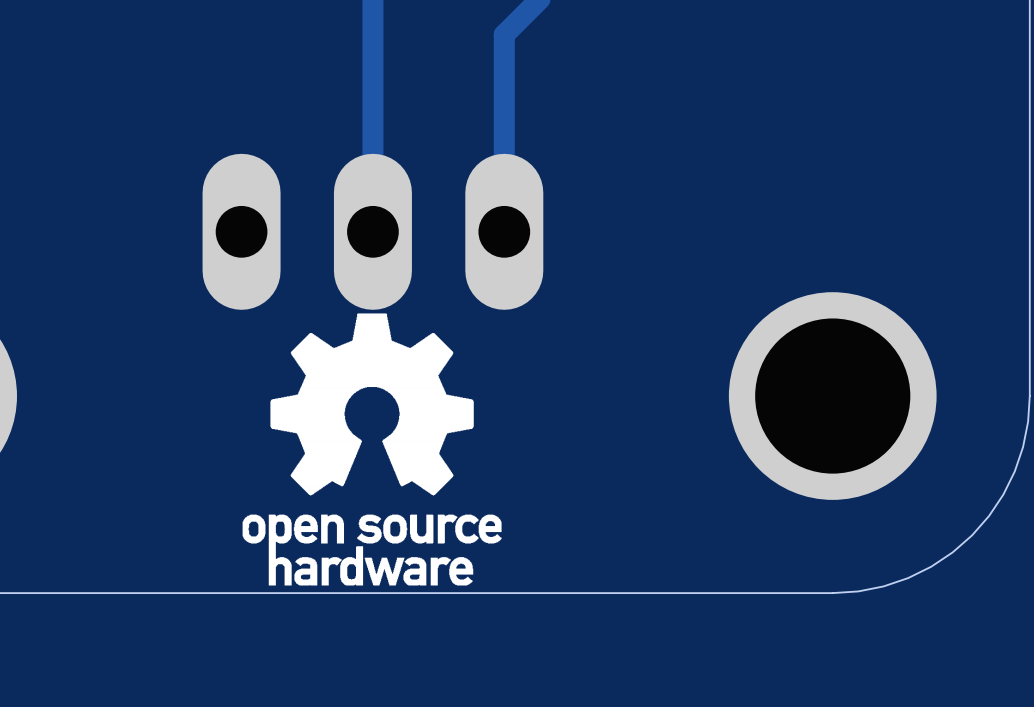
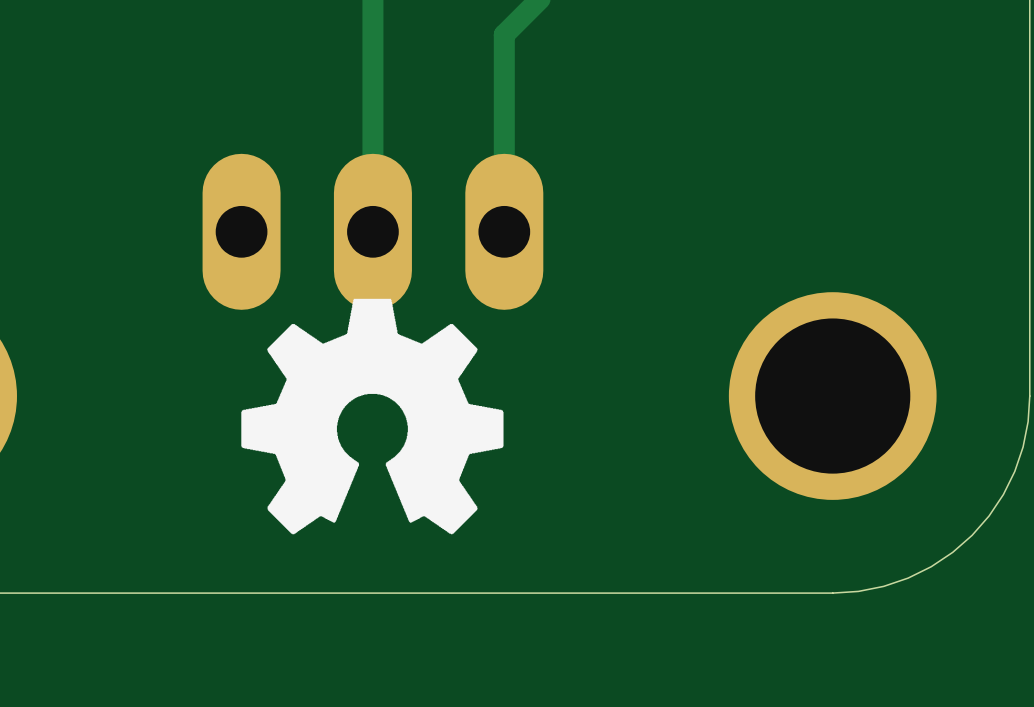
drawing shape: [242, 313, 502, 586] -> [241, 298, 504, 535]

